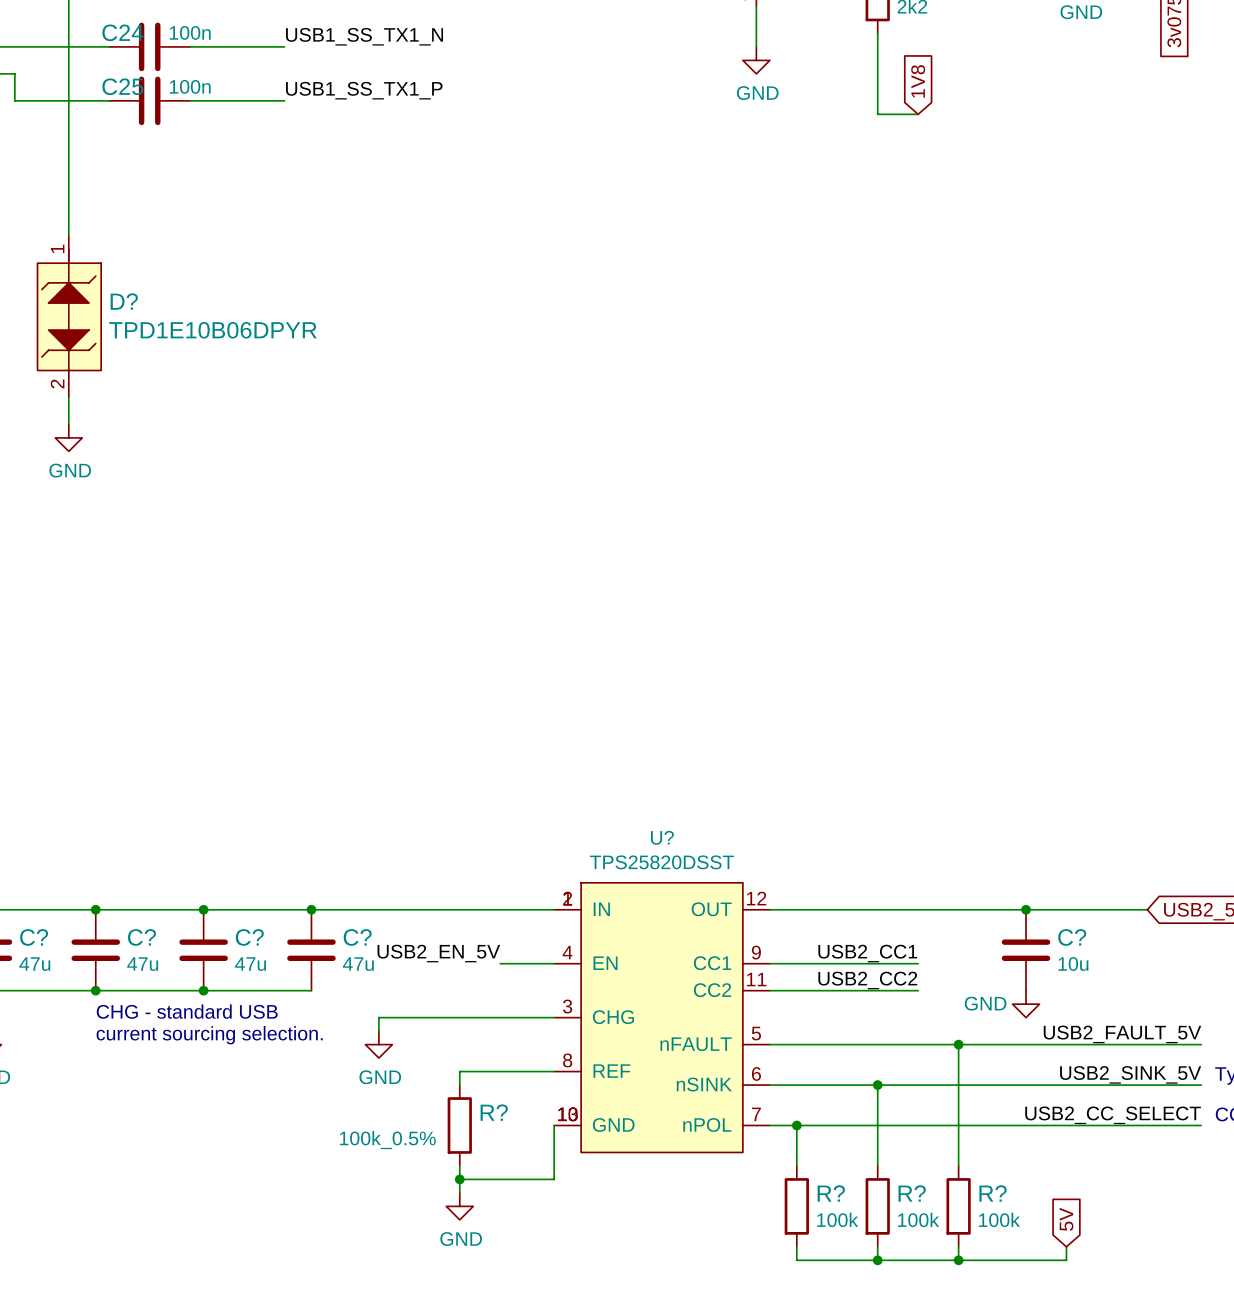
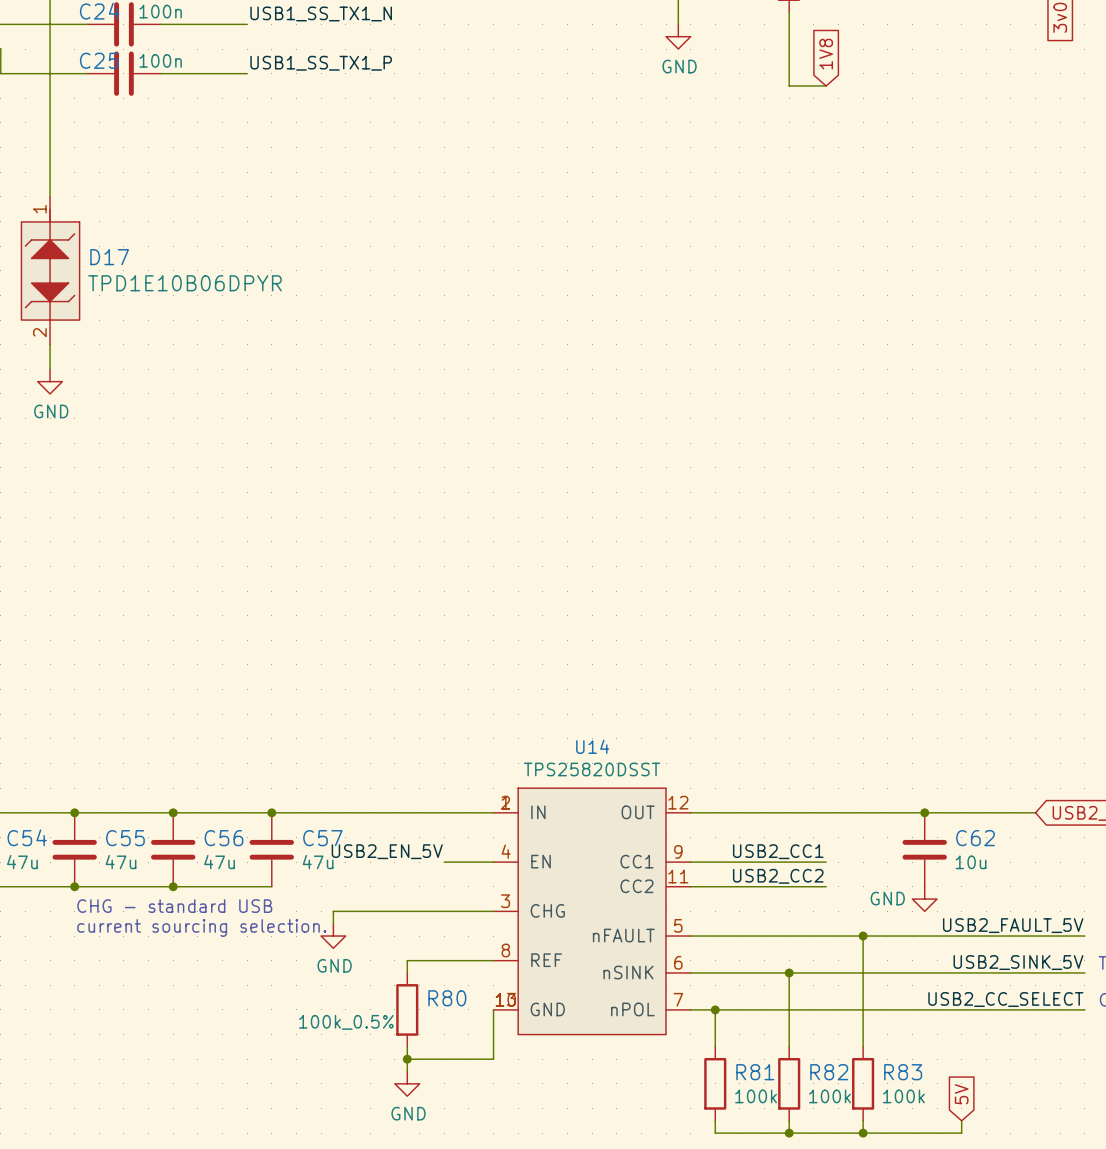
D? name: D? (124, 301) -> D17 (109, 257)
U? name: U? (662, 837) -> U14 (592, 746)
C? name: C? (34, 937) -> C54 (27, 837)
C? name: C? (141, 937) -> C55 (125, 838)
C? name: C? (249, 937) -> C56 (224, 838)
C? name: C? (357, 937) -> C57 (322, 838)
C? name: C? (1072, 937) -> C62 (975, 838)
R? name: R? (494, 1112) -> R80 (447, 998)
R? name: R? (831, 1193) -> R81 (755, 1072)
R? name: R? (912, 1193) -> R82 (829, 1072)
R? name: R? (993, 1193) -> R83 (903, 1072)

